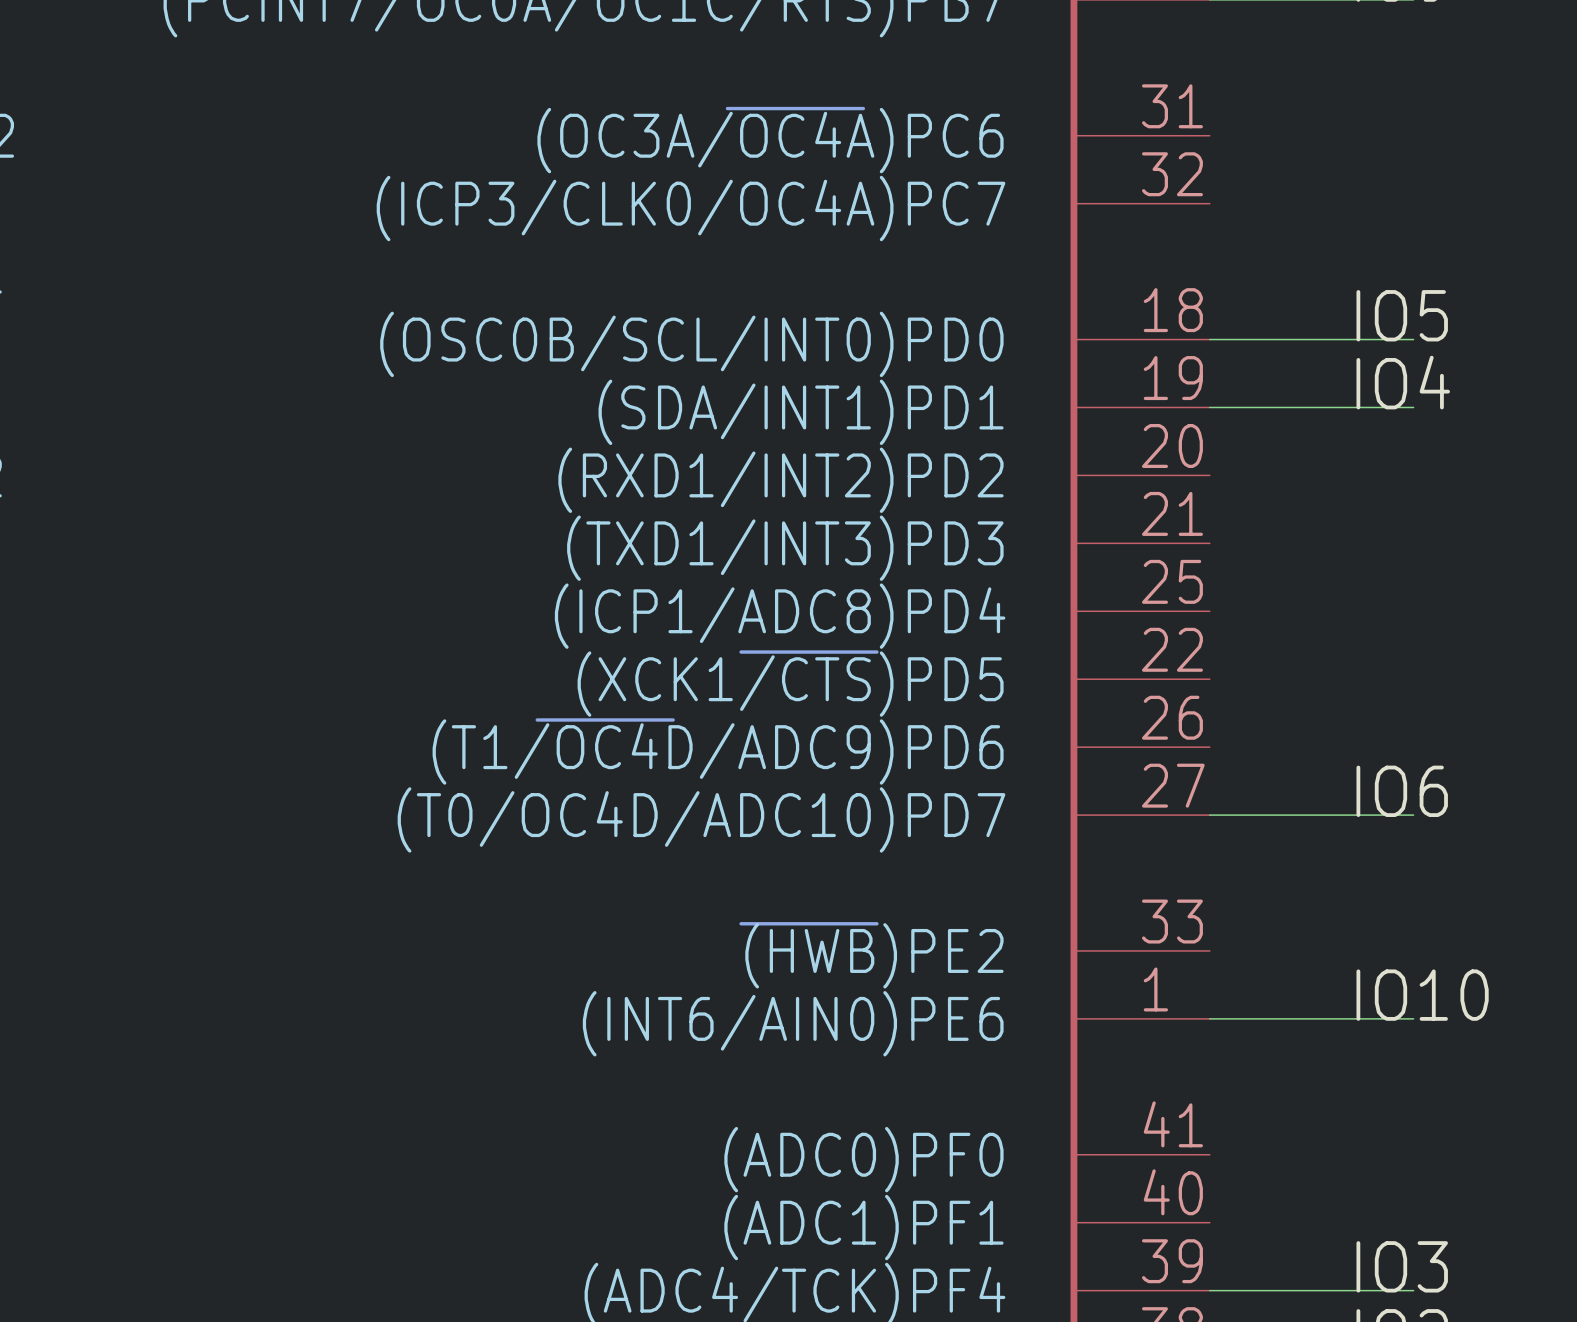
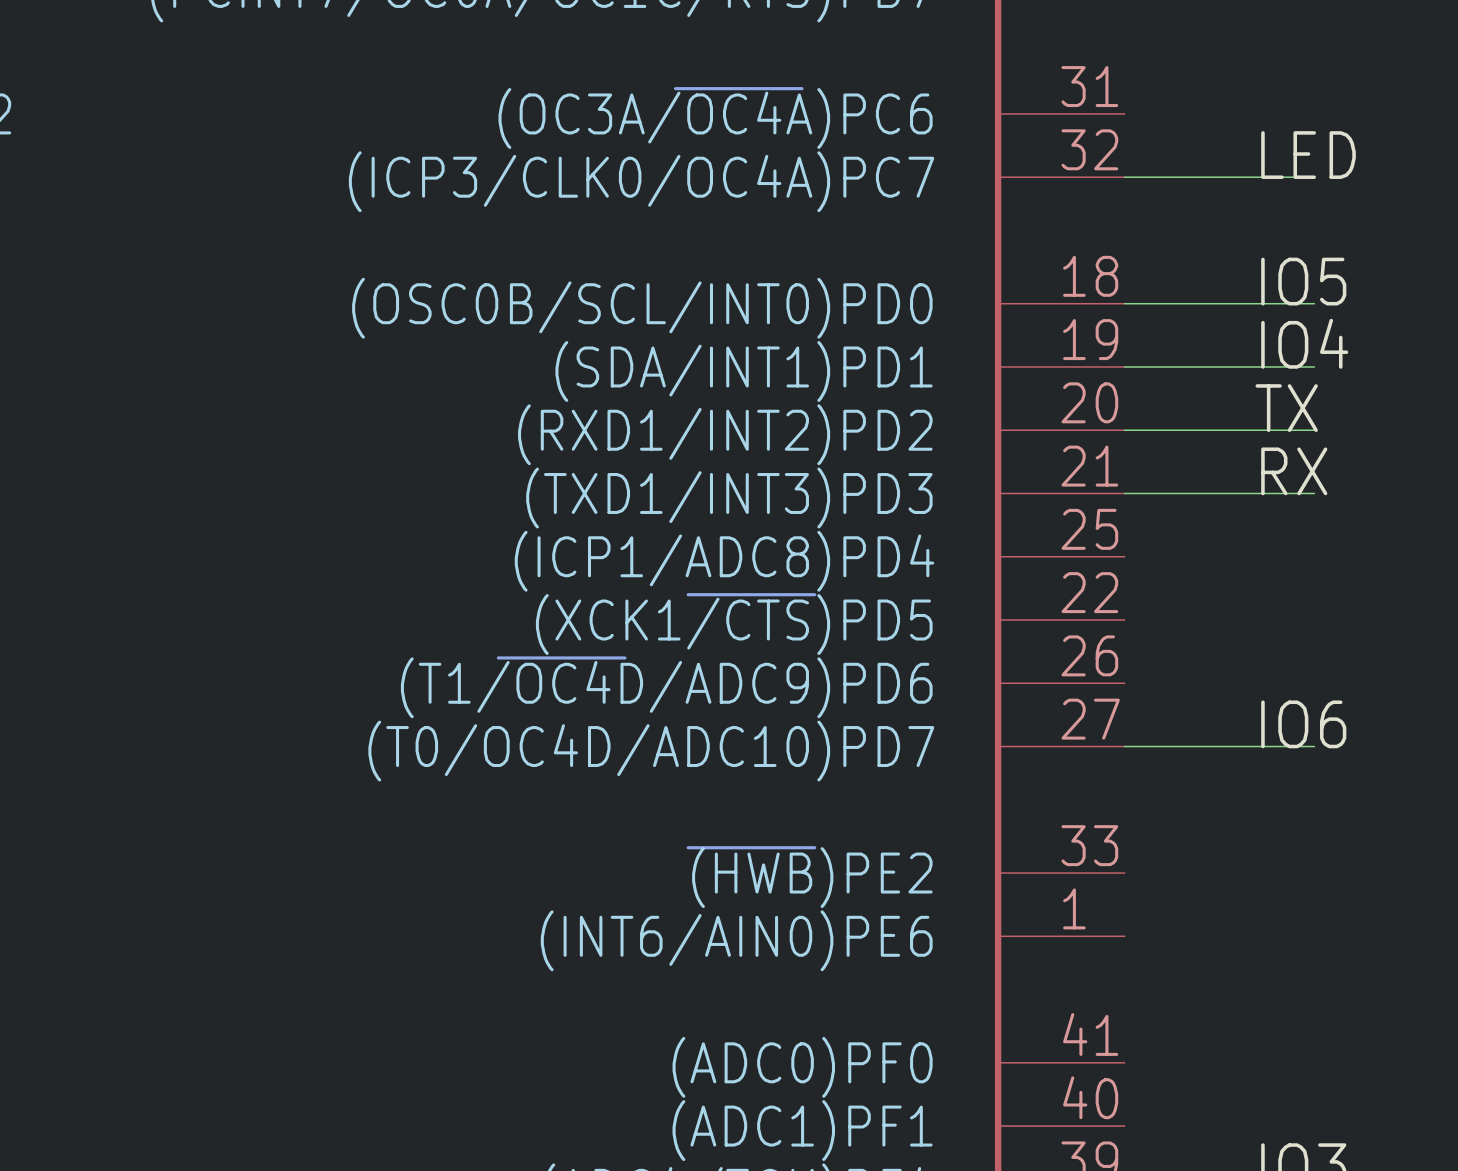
label: none -> LED (1308, 155)
wire: none -> (1124, 177) (1314, 177)
label: none -> TX (1286, 408)
wire: none -> (1124, 430) (1314, 430)
label: none -> RX (1294, 471)
label: IO10 (1422, 995) -> none
wire: (1209, 1018) (1413, 1018) -> (1124, 493) (1314, 493)

